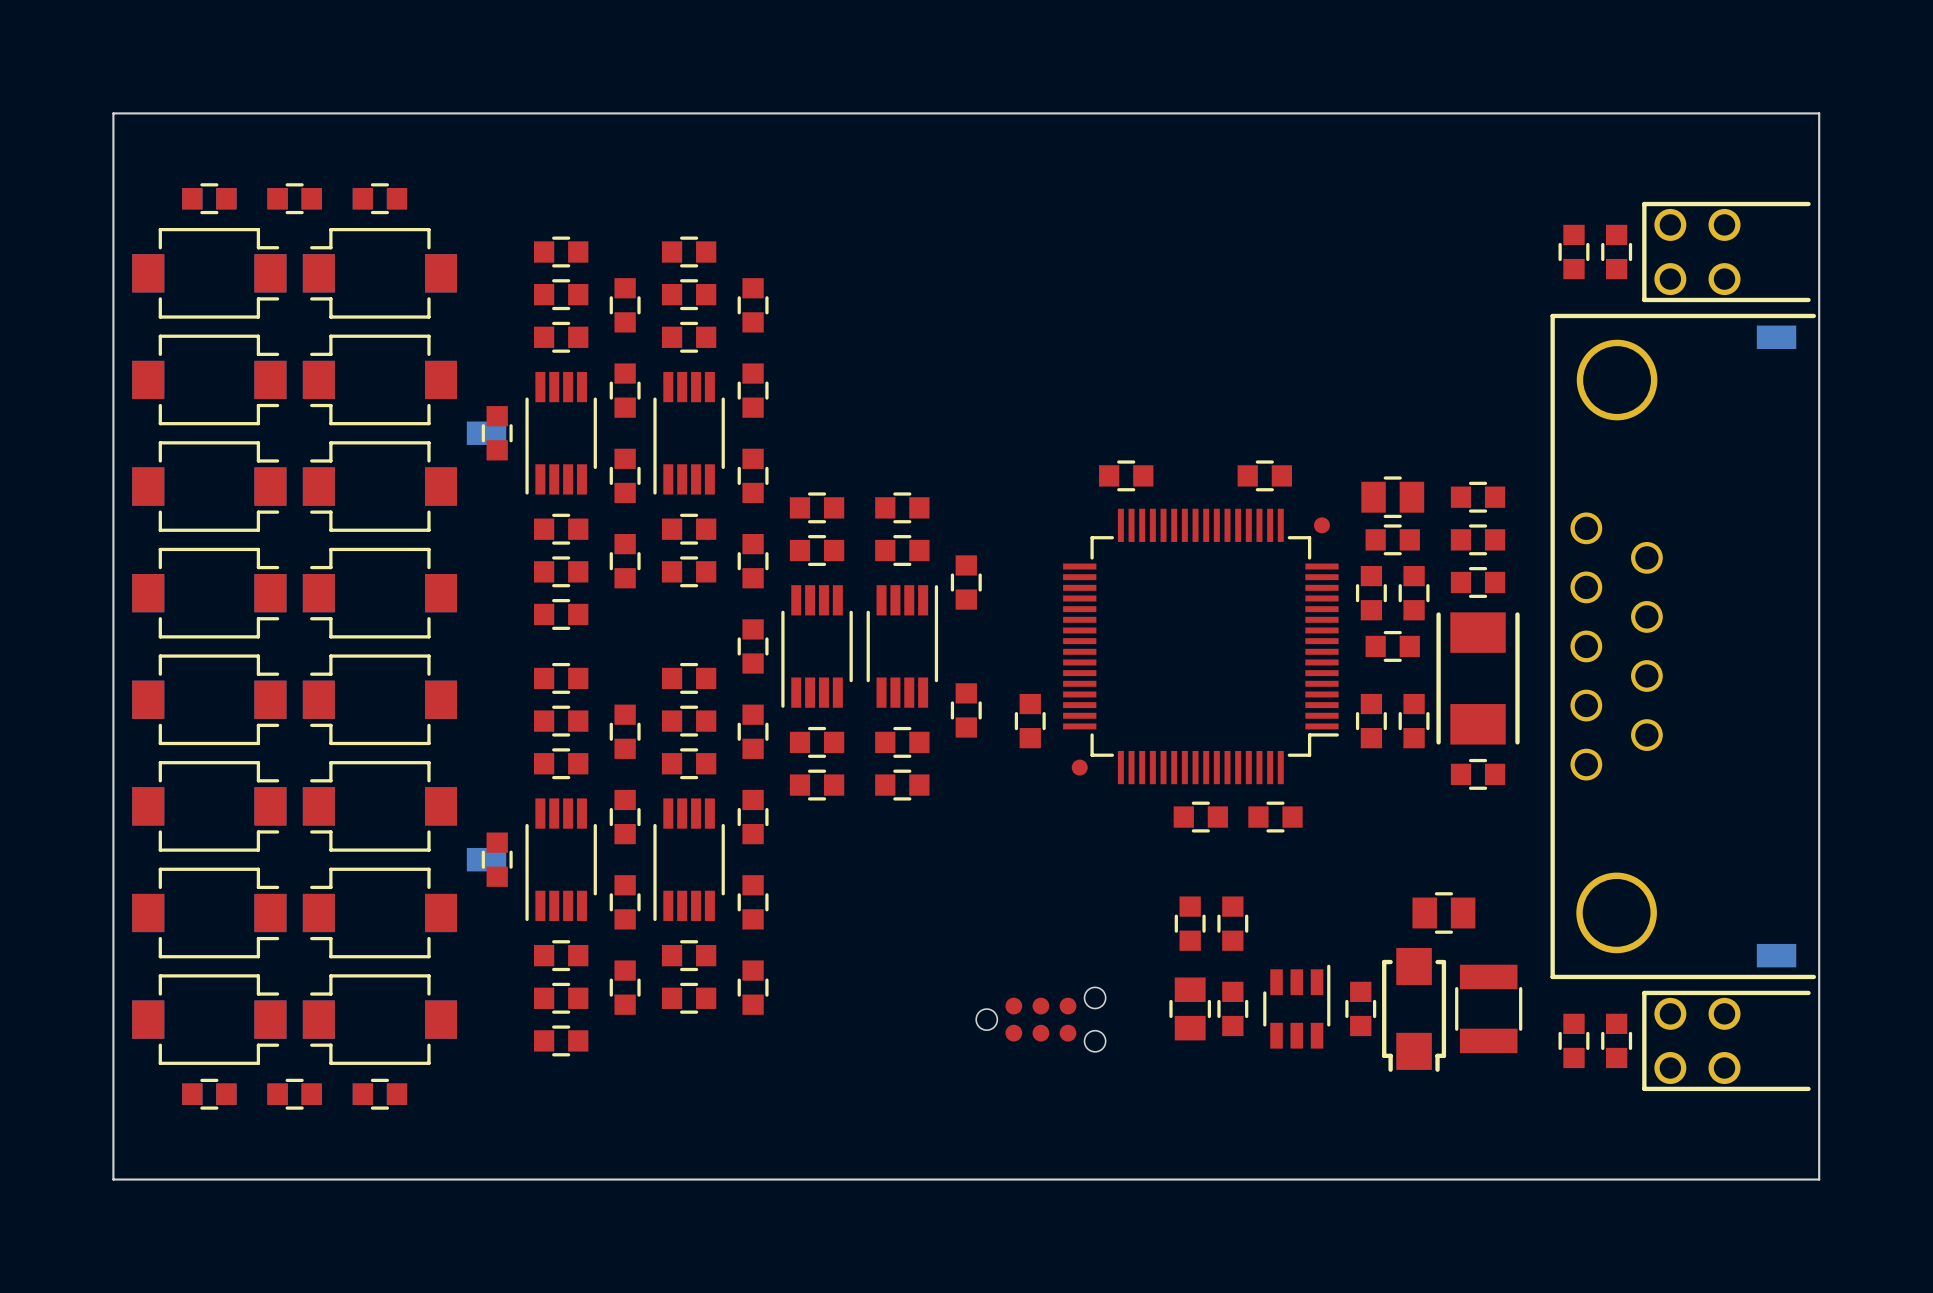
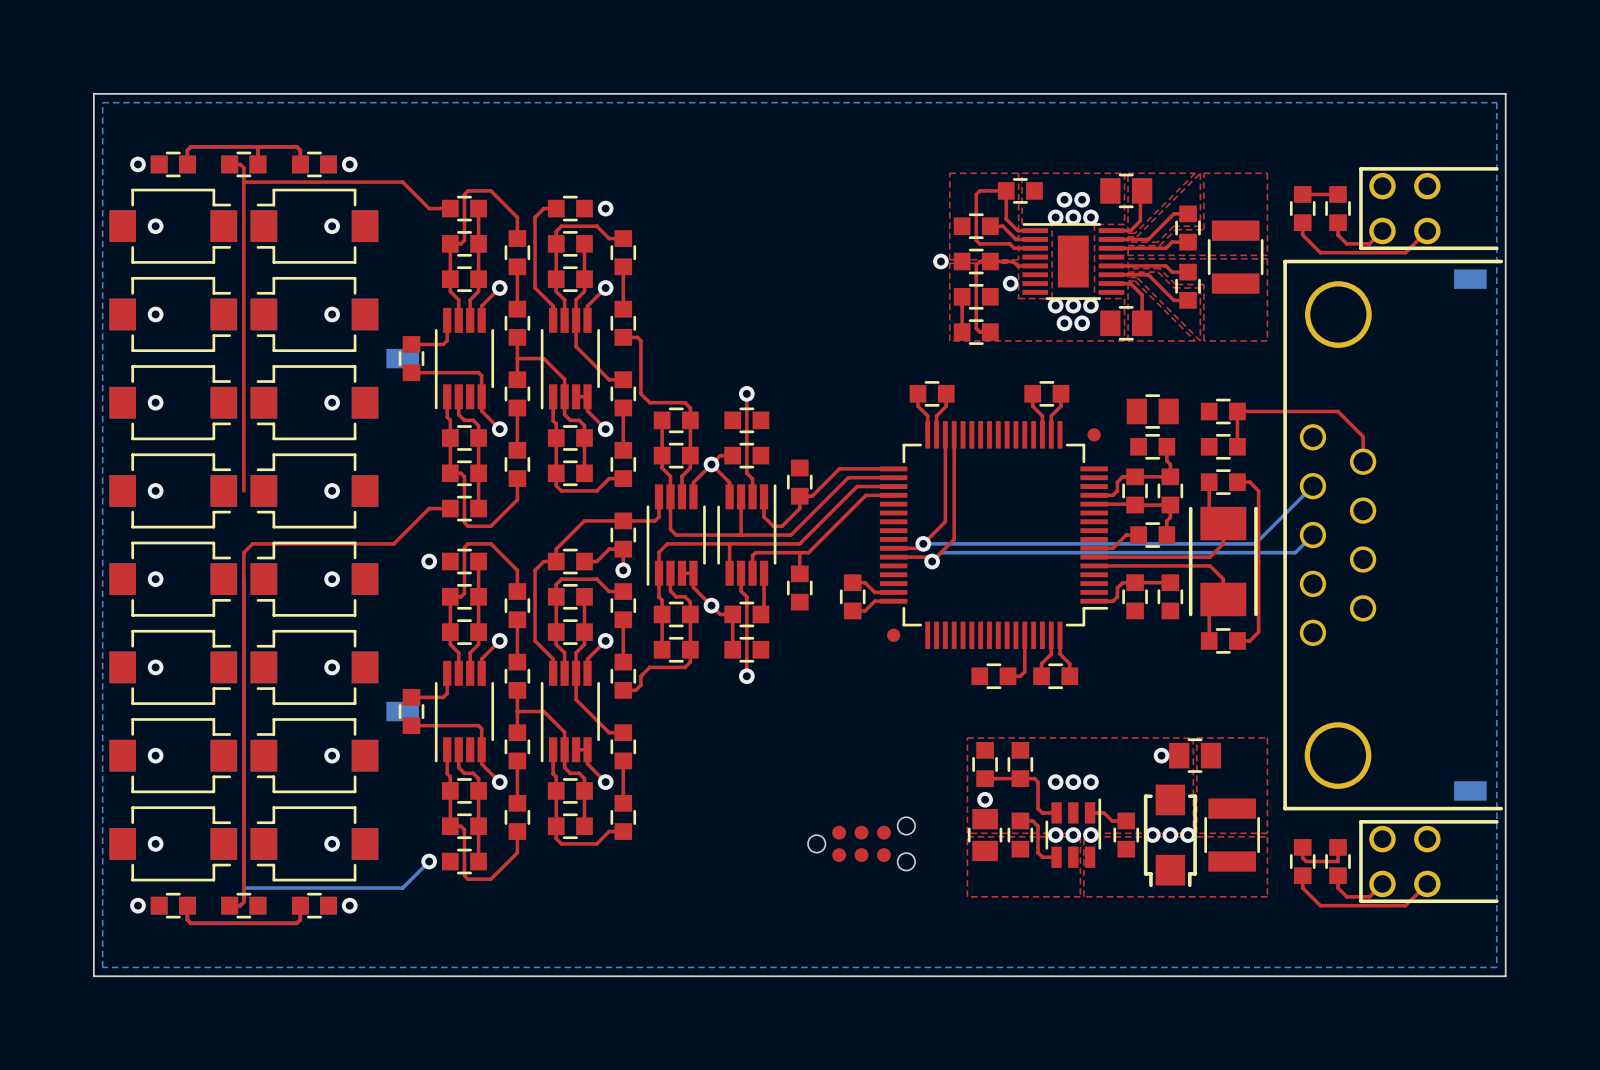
bottom zone outline: none -> (102, 102) (102, 967) (1496, 967) (1496, 102) (102, 102)
top track: none -> (257, 146) (257, 164)
via: none -> (137, 164)
top track: none -> (187, 164) (187, 150) (190, 146) (296, 146) (300, 150) (300, 164)
top track: none -> (229, 164) (240, 164) (243, 167) (243, 490)
via: none -> (349, 164)
top zone outline: none -> (949, 173) (1018, 173) (1018, 259) (949, 259) (949, 173)
top zone outline: none -> (1022, 173) (1124, 173) (1124, 224) (1094, 224) (1094, 298) (1124, 298) (1124, 340) (949, 340) (949, 263) (1018, 263) (1018, 298) (1052, 298) (1052, 224) (1022, 224) (1022, 173)
top zone outline: none -> (1128, 173) (1128, 233) (1135, 233) (1195, 173) (1128, 173)
top zone outline: none -> (1200, 173) (1200, 226) (1173, 226) (1158, 242) (1128, 242) (1128, 236) (1136, 236) (1200, 173)
top zone outline: none -> (1203, 173) (1203, 229) (1175, 229) (1159, 245) (1128, 245) (1128, 255) (1267, 255) (1267, 173) (1203, 173)
top track: none -> (243, 182) (402, 182) (429, 208) (450, 208)
part: none -> (1020, 190)
part: none -> (1126, 190)
top track: none -> (1140, 190) (1140, 220) (1130, 230) (1111, 230)
top track: none -> (1302, 194) (1338, 194)
via: none -> (1064, 199)
via: none -> (1082, 199)
top track: none -> (478, 208) (478, 291) (470, 299) (470, 320)
top track: none -> (556, 208) (543, 208) (535, 217) (535, 287) (553, 306) (553, 320)
via: none -> (605, 208)
top track: none -> (1188, 213) (1173, 213) (1148, 239) (1111, 239)
via: none -> (1055, 217)
via: none -> (1073, 217)
via: none -> (1090, 217)
top track: none -> (1302, 222) (1302, 235) (1320, 252) (1405, 252) (1427, 230)
top track: none -> (1338, 222) (1338, 235) (1346, 243) (1369, 243) (1382, 230)
via: none -> (155, 226)
via: none -> (332, 226)
part: none -> (976, 226)
top track: none -> (990, 226) (1002, 226) (1015, 239) (1035, 239)
part: none -> (1188, 227)
top track: none -> (1035, 230) (1017, 230) (1006, 219) (1006, 190) (979, 190) (976, 194) (976, 240) (979, 243) (1009, 243) (1014, 248) (1035, 248)
top track: none -> (517, 238) (517, 217) (490, 190) (467, 190) (464, 194) (464, 240) (460, 243) (450, 243) (450, 291) (458, 299) (458, 320)
top track: none -> (623, 238) (609, 238) (596, 226) (561, 226) (556, 231) (556, 291) (564, 299) (564, 320)
top track: none -> (1188, 242) (1172, 242) (1165, 248) (1111, 248)
top track: none -> (584, 243) (584, 291) (576, 299) (576, 346) (609, 379) (623, 379)
part: none -> (1235, 257)
top zone outline: none -> (1128, 258) (1128, 268) (1159, 268) (1175, 284) (1203, 284) (1203, 340) (1267, 340) (1267, 258) (1128, 258)
via: none -> (940, 261)
part: none -> (976, 261)
part: none -> (1073, 261)
top track: none -> (1035, 265) (1017, 265) (1013, 261) (979, 261) (976, 265) (976, 328) (979, 332) (990, 332)
top track: none -> (1111, 265) (1165, 265) (1172, 272) (1188, 272)
top track: none -> (517, 266) (517, 309)
top track: none -> (623, 266) (623, 309)
top zone outline: none -> (1128, 272) (1128, 277) (1136, 277) (1200, 340) (1200, 287) (1173, 287) (1158, 272) (1128, 272)
top track: none -> (1111, 274) (1148, 274) (1173, 300) (1188, 300)
top zone outline: none -> (1128, 280) (1128, 340) (1195, 340) (1135, 280) (1128, 280)
via: none -> (1010, 283)
top track: none -> (1111, 283) (1130, 283) (1142, 295) (1142, 323)
part: none -> (1188, 286)
top track: none -> (499, 287) (481, 306) (481, 320)
via: none -> (499, 287)
top track: none -> (605, 287) (587, 306) (587, 320)
via: none -> (605, 287)
top track: none -> (962, 296) (962, 332)
part: none -> (976, 296)
via: none -> (1055, 305)
via: none -> (1073, 305)
via: none -> (1090, 305)
via: none -> (155, 314)
via: none -> (332, 314)
top track: none -> (447, 320) (447, 340) (443, 344) (411, 344)
via: none -> (1064, 323)
via: none -> (1082, 323)
part: none -> (1126, 323)
part: none -> (976, 332)
top track: none -> (517, 337) (517, 379)
top track: none -> (623, 337) (637, 337) (640, 340) (640, 393) (649, 402) (685, 402) (690, 407) (690, 467) (681, 476) (681, 496)
top track: none -> (517, 358) (543, 358) (564, 379) (564, 414) (570, 420) (579, 420) (584, 425) (584, 473)
top track: none -> (411, 372) (478, 372) (481, 375) (481, 411) (499, 429)
top track: none -> (746, 393) (746, 473) (752, 479) (752, 496)
via: none -> (746, 393)
top track: none -> (918, 393) (918, 406) (927, 415) (927, 434)
top track: none -> (946, 393) (946, 406) (936, 415) (936, 434)
top track: none -> (1032, 393) (1032, 406) (1042, 415) (1042, 434)
top track: none -> (1060, 393) (1060, 406) (1051, 415) (1051, 434)
top track: none -> (447, 396) (447, 417) (450, 420) (450, 473) (460, 473) (464, 476) (464, 522) (467, 526) (490, 526) (517, 499) (517, 478)
top track: none -> (458, 396) (458, 414) (464, 420) (473, 420) (478, 425) (478, 508)
top track: none -> (553, 396) (553, 420) (556, 423) (556, 485) (561, 490) (596, 490) (609, 478) (623, 478)
top track: none -> (576, 396) (587, 396) (587, 411) (605, 429)
via: none -> (155, 402)
via: none -> (332, 402)
top track: none -> (517, 407) (517, 450)
top track: none -> (623, 407) (623, 450)
top track: none -> (662, 420) (662, 467) (670, 476) (670, 529) (676, 535) (790, 535) (848, 477) (893, 477)
via: none -> (499, 429)
via: none -> (605, 429)
top track: none -> (945, 434) (945, 521) (918, 548) (893, 548)
top track: none -> (954, 434) (954, 539) (932, 561) (927, 557) (893, 557)
top track: none -> (1166, 446) (1166, 460) (1170, 464) (1170, 476) (1122, 476) (1117, 482) (1117, 490) (1113, 495) (1094, 495)
top track: none -> (1237, 446) (1237, 411) (1338, 411) (1363, 436) (1363, 461)
top track: none -> (732, 455) (720, 455) (693, 482) (693, 496)
top track: none -> (711, 464) (729, 482) (729, 496)
via: none -> (711, 464)
top track: none -> (893, 468) (839, 468) (812, 496) (799, 496) (799, 508) (782, 526) (773, 526) (764, 516) (764, 496)
top track: none -> (1209, 482) (1209, 509) (1223, 523) (1223, 543) (1210, 557) (1094, 557)
top track: none -> (1237, 482) (1249, 482) (1258, 490) (1258, 632) (1249, 640) (1237, 640)
top track: none -> (893, 486) (857, 486) (799, 543) (667, 543) (659, 552) (659, 597) (662, 600) (662, 649)
bottom track: none -> (1312, 486) (1255, 543) (923, 543)
via: none -> (155, 490)
via: none -> (332, 490)
top track: none -> (893, 495) (865, 495) (808, 552) (755, 552) (752, 555) (752, 573)
top track: none -> (659, 496) (659, 516) (655, 520) (584, 520) (556, 549) (556, 561) (543, 561) (535, 570) (535, 640) (553, 659) (553, 673)
top track: none -> (741, 496) (741, 535)
top track: none -> (1094, 504) (1170, 505) (1170, 517) (1166, 520) (1166, 535)
top track: none -> (450, 508) (429, 508) (393, 543) (252, 543) (243, 552) (243, 902) (240, 905) (229, 905)
top track: none -> (1138, 535) (1126, 535) (1113, 548) (1094, 548)
bottom track: none -> (1312, 535) (1295, 552) (940, 552) (932, 561)
top track: none -> (729, 543) (729, 573)
via: none -> (923, 543)
top track: none -> (799, 552) (799, 573)
via: none -> (429, 561)
top track: none -> (478, 561) (478, 644) (470, 652) (470, 673)
top track: none -> (584, 561) (596, 561) (609, 549) (623, 549) (623, 570)
via: none -> (932, 561)
top track: none -> (1094, 565) (1210, 565) (1223, 579) (1223, 599) (1209, 613) (1209, 640)
via: none -> (623, 570)
top track: none -> (670, 573) (670, 591) (676, 596) (685, 596) (690, 602) (690, 662) (685, 667) (649, 667) (640, 676) (640, 685) (635, 690) (623, 690)
top track: none -> (681, 573) (693, 573) (693, 587) (720, 614) (732, 614) (732, 649)
top track: none -> (741, 573) (741, 591) (746, 596) (746, 676)
top track: none -> (764, 573) (764, 611) (760, 614)
via: none -> (155, 579)
via: none -> (332, 579)
top track: none -> (852, 582) (865, 582) (874, 592) (893, 592)
top track: none -> (1170, 582) (1122, 582) (1117, 588) (1117, 596) (1113, 601) (1094, 601)
top track: none -> (517, 591) (517, 570) (490, 543) (467, 543) (464, 547) (464, 593) (460, 596) (450, 596) (450, 644) (458, 652) (458, 673)
top track: none -> (623, 591) (609, 591) (596, 579) (561, 579) (556, 584) (556, 644) (564, 652) (564, 673)
top track: none -> (584, 596) (584, 644) (576, 652) (576, 699) (609, 732) (623, 732)
top track: none -> (893, 601) (874, 601) (865, 610) (852, 610)
via: none -> (711, 605)
top track: none -> (517, 619) (517, 662)
top track: none -> (623, 619) (623, 662)
top track: none -> (1024, 635) (1024, 671) (1020, 676) (1008, 676)
top track: none -> (1051, 635) (1051, 654) (1041, 663) (1041, 676)
top track: none -> (1060, 635) (1060, 654) (1069, 663) (1069, 676)
top track: none -> (499, 640) (481, 659) (481, 673)
via: none -> (499, 640)
top track: none -> (605, 640) (587, 659) (587, 673)
via: none -> (605, 640)
via: none -> (155, 667)
via: none -> (332, 667)
top track: none -> (447, 673) (447, 693) (443, 697) (411, 697)
via: none -> (746, 676)
top track: none -> (517, 690) (517, 732)
top track: none -> (517, 711) (543, 711) (564, 732) (564, 767) (570, 773) (579, 773) (584, 778) (584, 826)
top track: none -> (411, 725) (478, 725) (481, 728) (481, 764) (499, 782)
top zone outline: none -> (967, 738) (967, 833) (1193, 833) (1193, 738) (967, 738)
top zone outline: none -> (1196, 738) (1267, 738) (1267, 833) (1196, 833) (1196, 738)
top track: none -> (447, 749) (447, 773) (450, 776) (450, 826) (460, 826) (464, 829) (464, 875) (467, 879) (490, 879) (517, 852) (517, 831)
top track: none -> (458, 749) (458, 767) (464, 773) (473, 773) (478, 778) (478, 861)
top track: none -> (553, 749) (553, 773) (556, 776) (556, 838) (561, 843) (596, 843) (609, 831) (623, 831)
top track: none -> (576, 749) (587, 749) (587, 764) (605, 782)
via: none -> (155, 755)
via: none -> (332, 755)
via: none -> (1161, 755)
top track: none -> (517, 760) (517, 803)
top track: none -> (623, 760) (623, 803)
top track: none -> (985, 778) (1034, 778) (1038, 782) (1038, 808) (1042, 812) (1056, 812)
via: none -> (499, 782)
via: none -> (605, 782)
via: none -> (1055, 782)
via: none -> (1073, 782)
via: none -> (1090, 782)
via: none -> (985, 799)
top track: none -> (1090, 812) (1104, 812) (1112, 820) (1126, 820)
top track: none -> (1020, 820) (1032, 820) (1038, 826) (1038, 852) (1042, 857) (1056, 857)
via: none -> (1055, 835)
via: none -> (1073, 835)
via: none -> (1090, 835)
via: none -> (1152, 835)
via: none -> (1170, 835)
via: none -> (1188, 835)
top zone outline: none -> (967, 836) (1080, 836) (1080, 896) (967, 896) (967, 836)
top zone outline: none -> (1083, 836) (1083, 896) (1267, 896) (1267, 836) (1083, 836)
via: none -> (155, 843)
via: none -> (332, 843)
top track: none -> (1302, 847) (1302, 858) (1306, 861) (1338, 861) (1338, 847)
bottom track: none -> (429, 861) (402, 888) (243, 888)
via: none -> (429, 861)
top track: none -> (1302, 875) (1302, 888) (1320, 905) (1405, 905) (1427, 883)
top track: none -> (1338, 875) (1338, 888) (1346, 896) (1369, 896) (1382, 883)
via: none -> (137, 905)
top track: none -> (187, 905) (187, 919) (190, 923) (296, 923) (300, 919) (300, 905)
via: none -> (349, 905)

